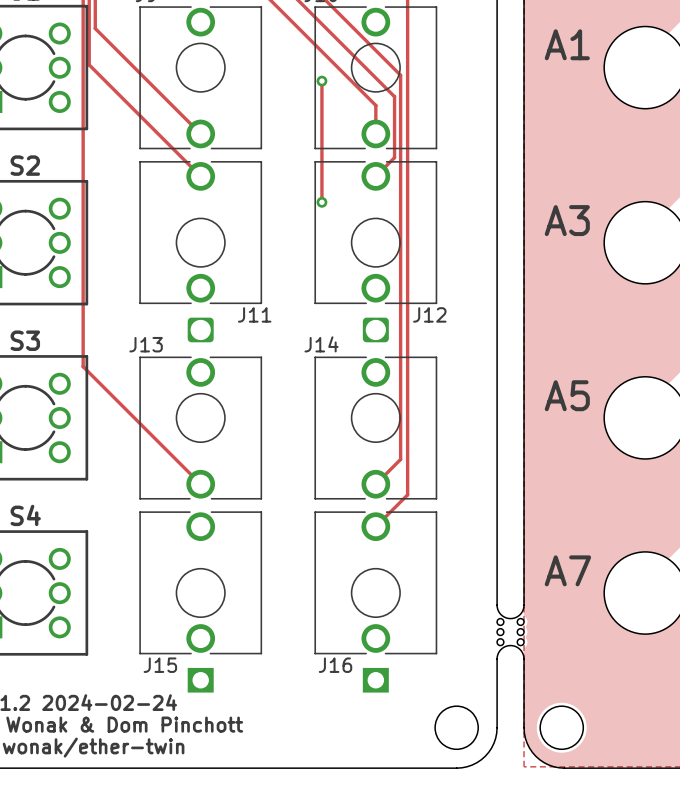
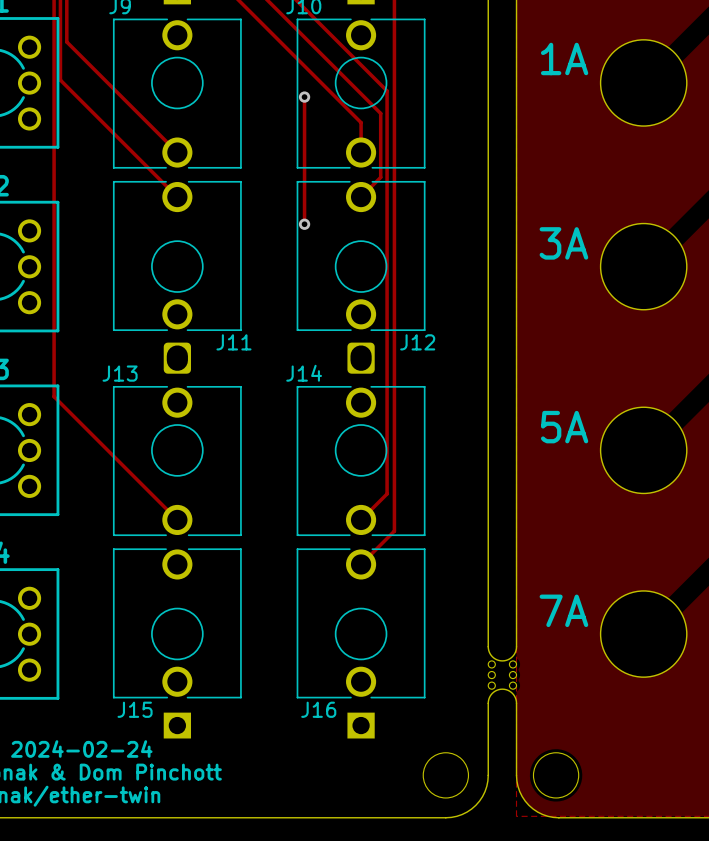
text: A1 (567, 44) -> 1A (564, 58)
J11 footprint: [139, 161, 263, 343] -> [112, 180, 242, 374]
J12 footprint: [314, 161, 438, 343] -> [296, 180, 426, 374]
text: A3 (567, 220) -> 3A (563, 243)
text: A5 (567, 395) -> 5A (564, 427)
text: A7 (567, 570) -> 7A (563, 610)

